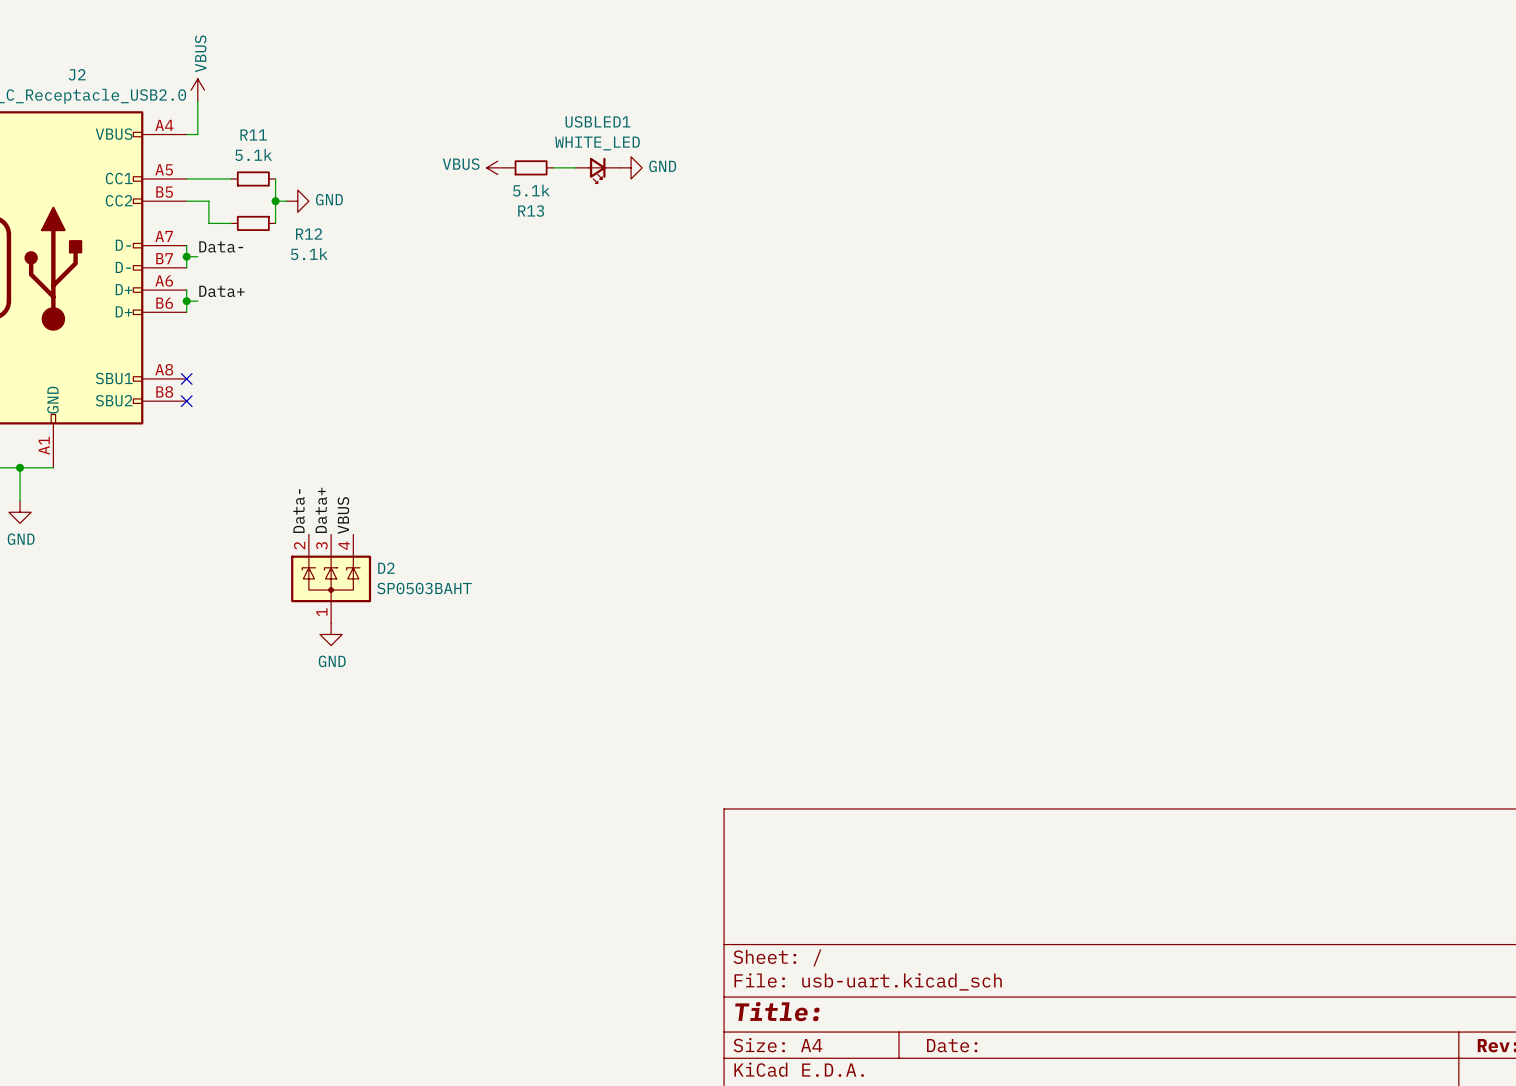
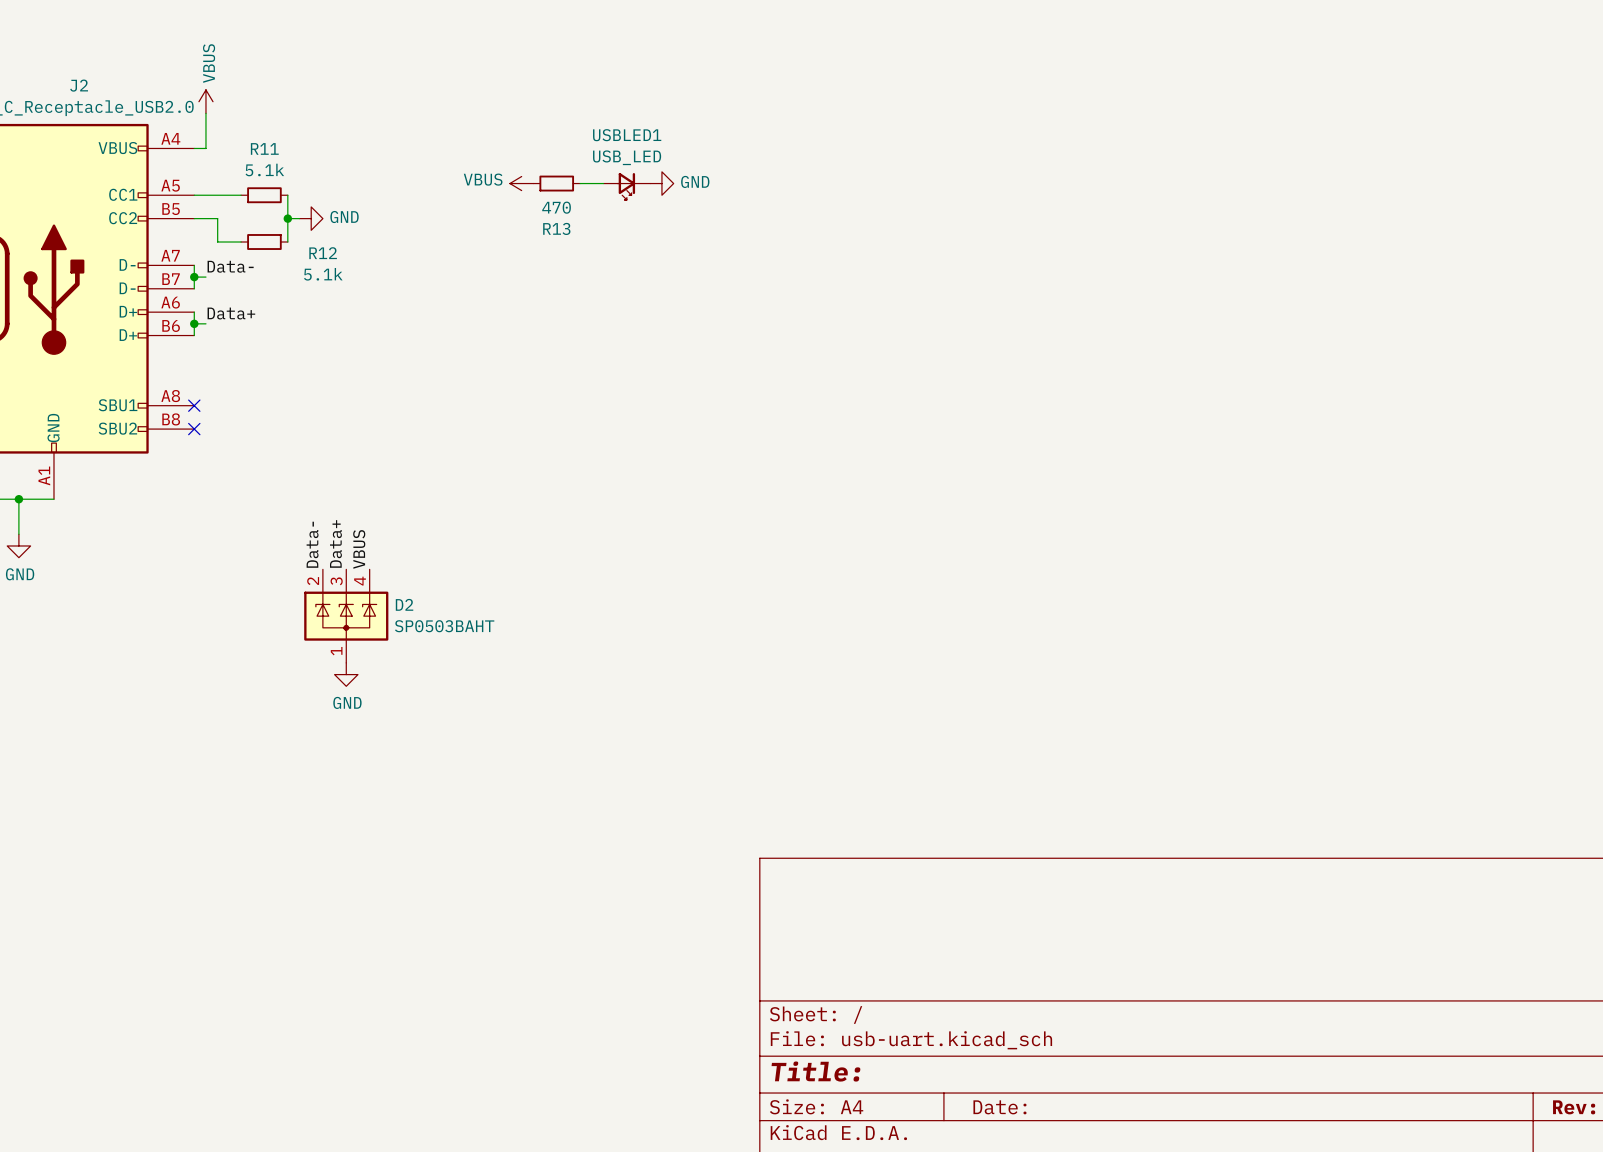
USBLED1 value: WHITE_LED (597, 143) -> USB_LED (627, 157)
R13 value: 5.1k (531, 190) -> 470 (556, 207)

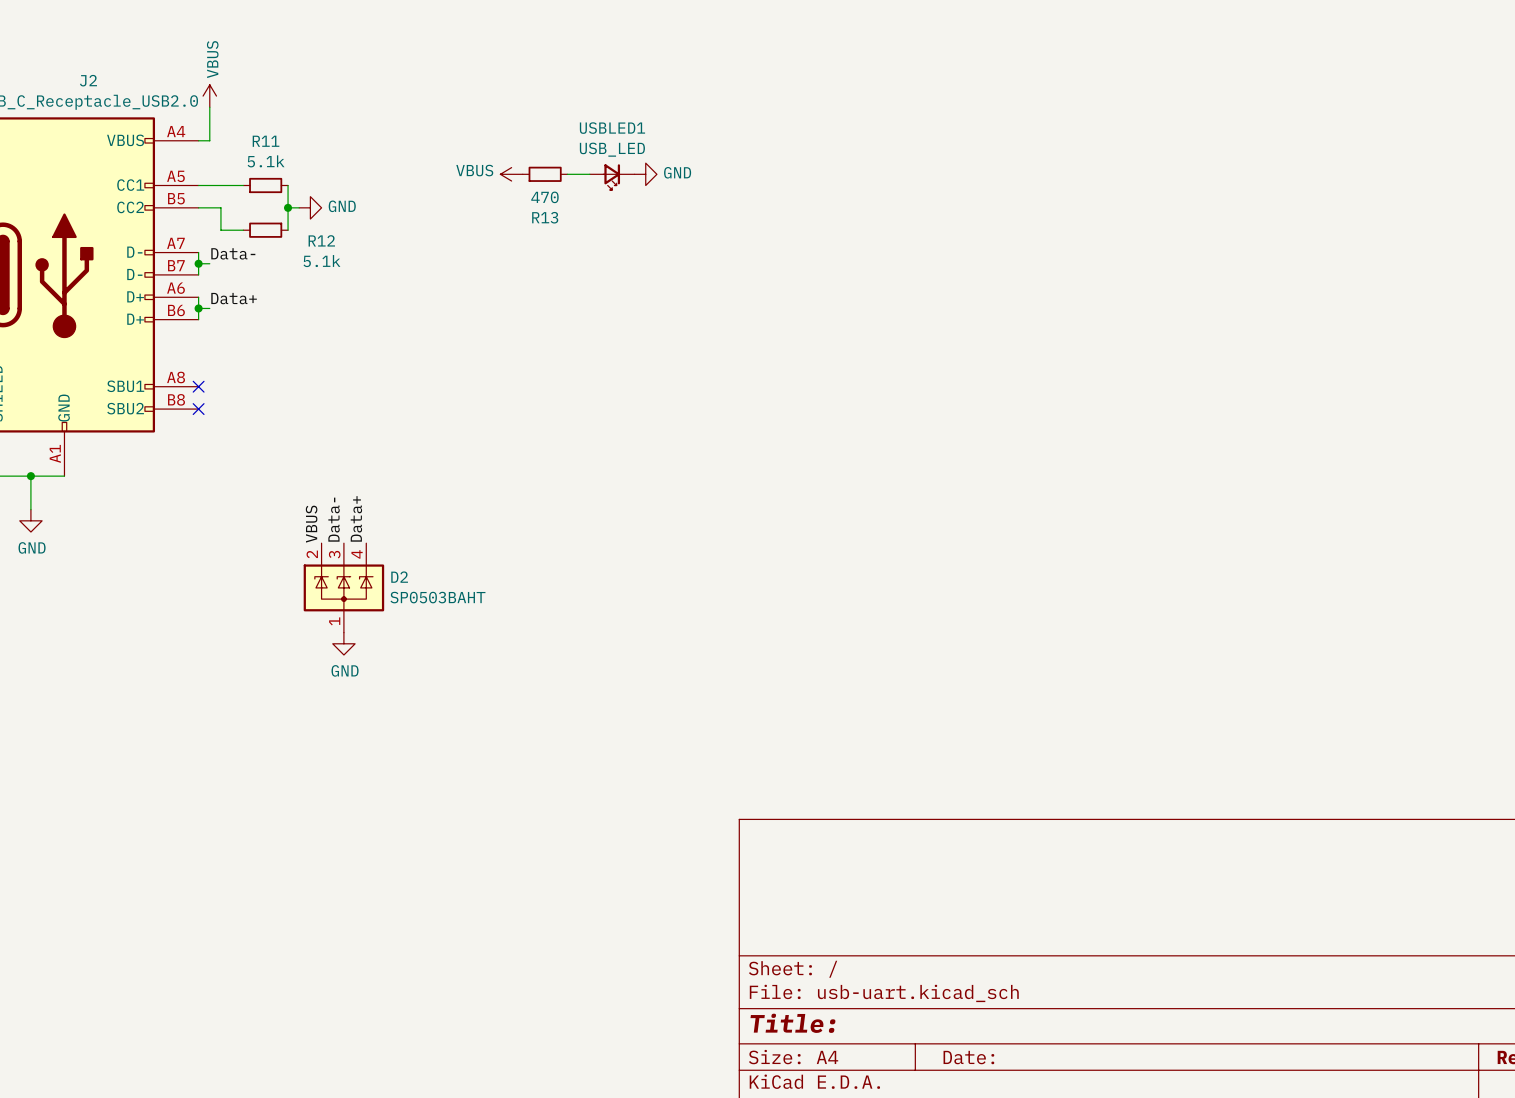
label: Data+ (335, 543) -> Data- (334, 519)
label: Data- (312, 544) -> VBUS (311, 524)
label: VBUS (359, 549) -> Data+ (356, 518)

